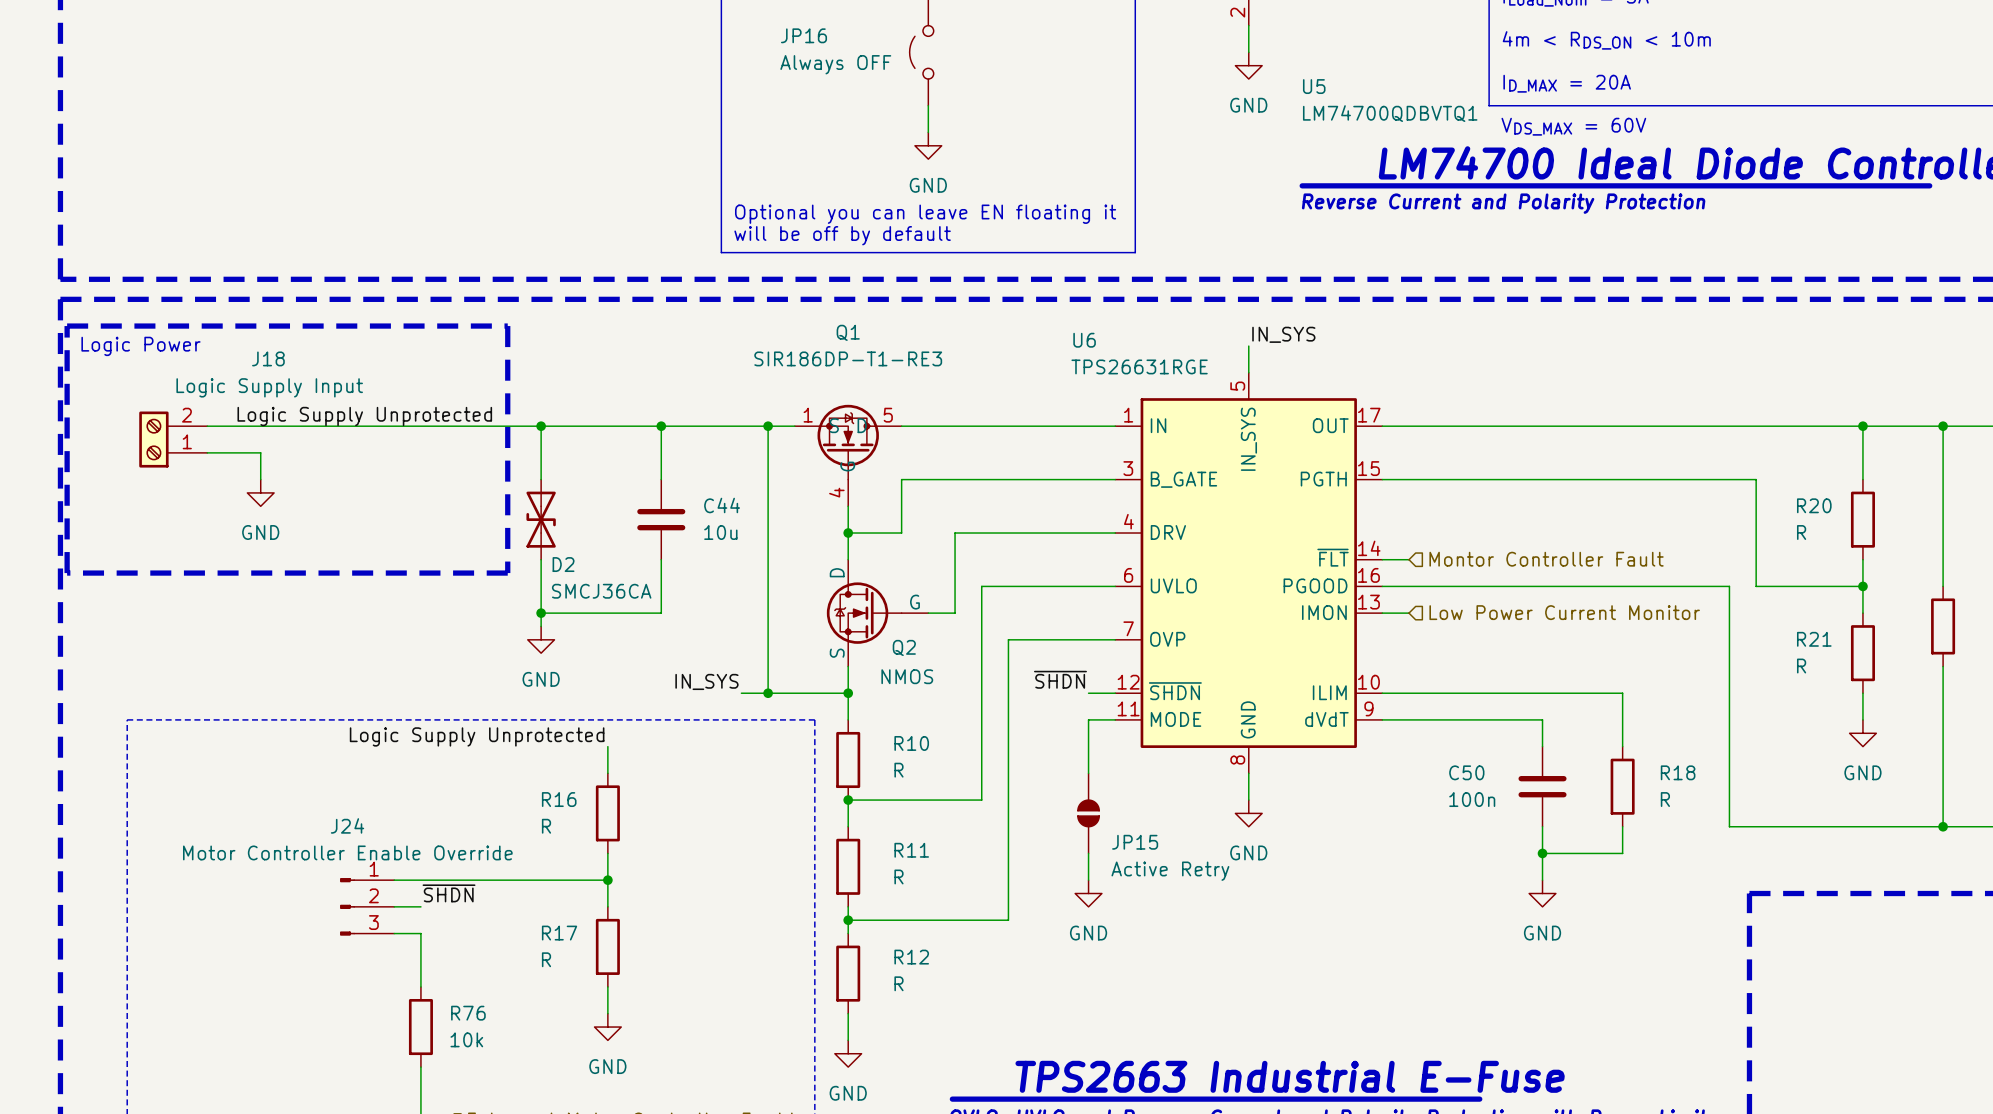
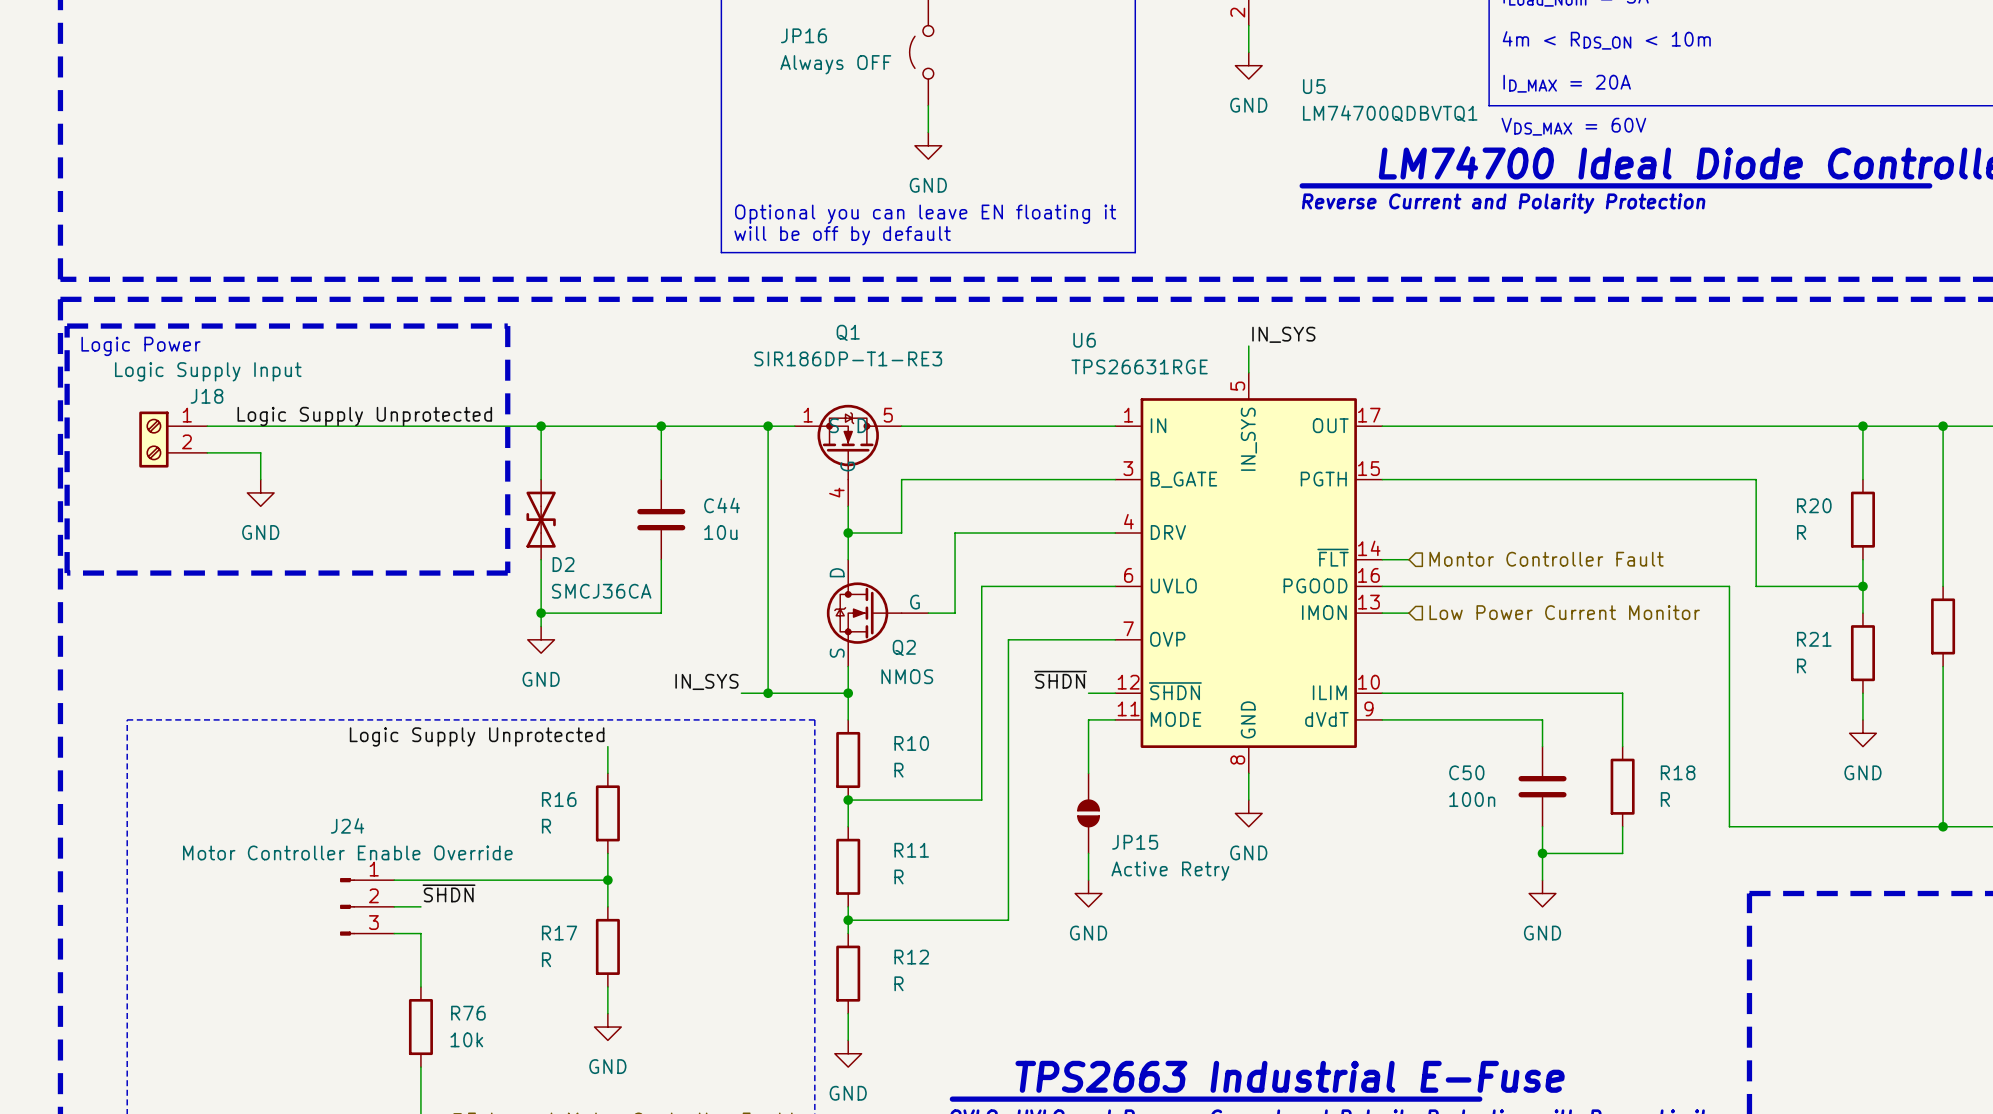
J18 name position: J18 (268, 358) -> J18 (207, 396)
J18 value position: Logic Supply Input (269, 387) -> Logic Supply Input (208, 371)
J18 flip: as is (153, 439) -> up-down (153, 439)

